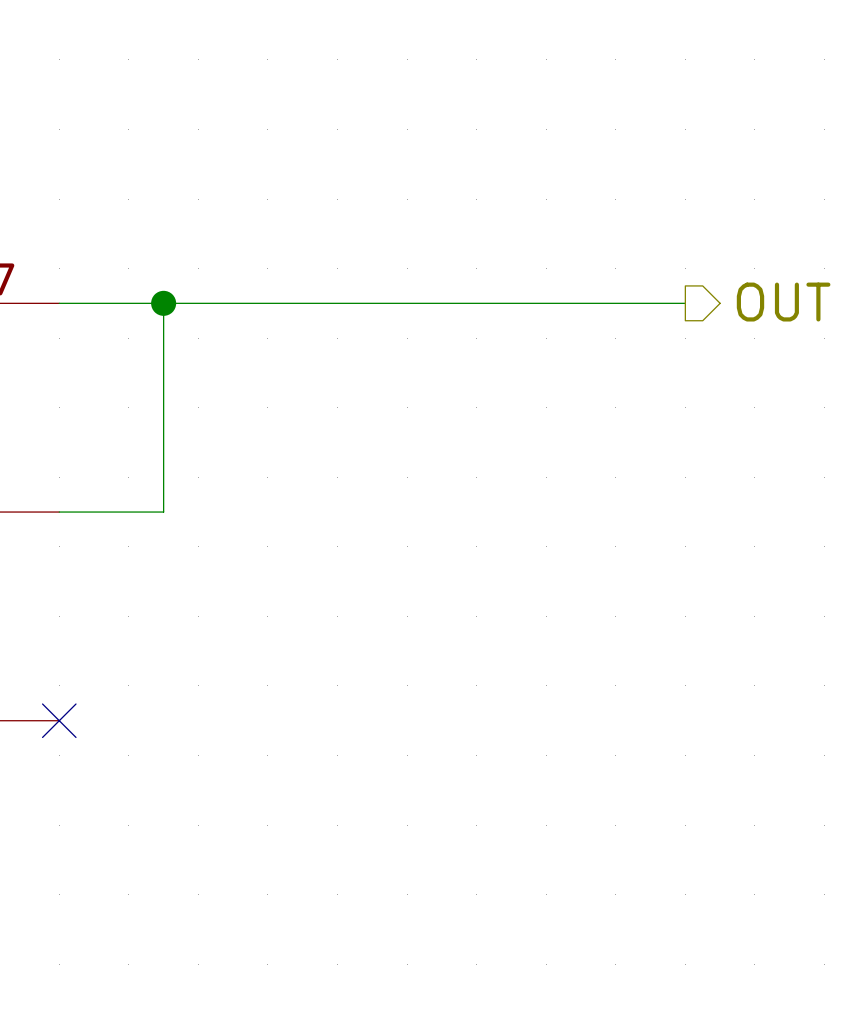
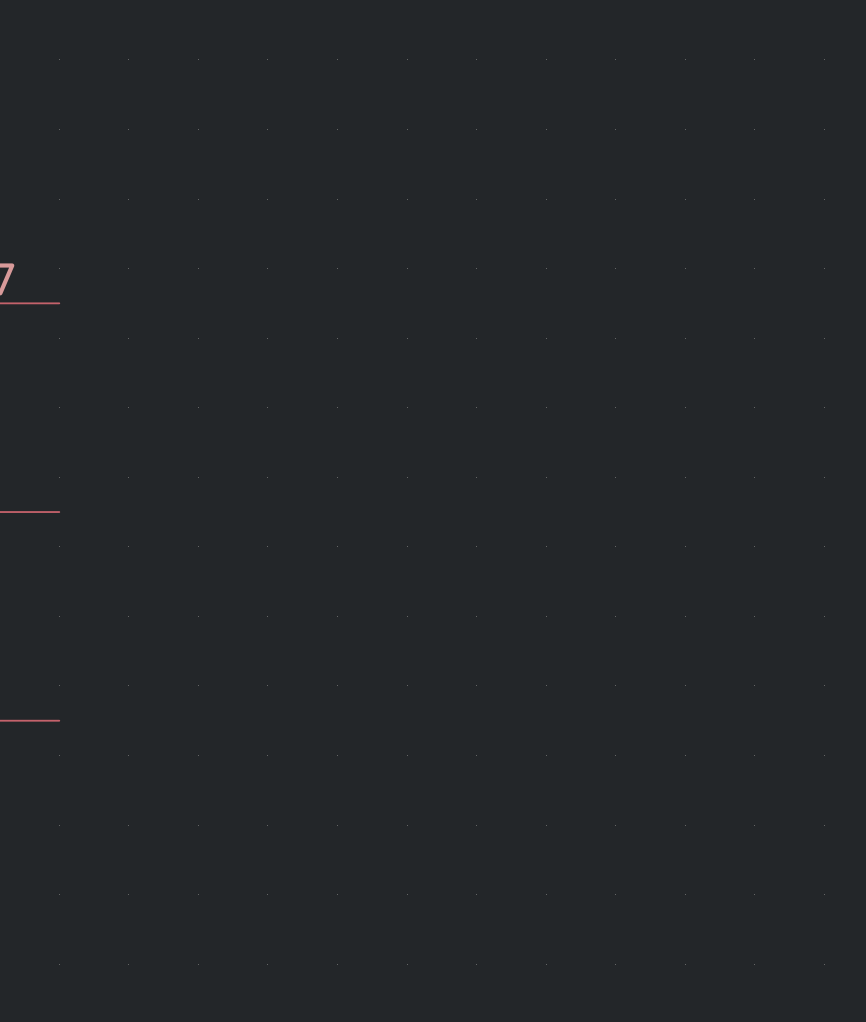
hierarchical label: OUT (783, 302) -> none
wire: (59, 303) (685, 303) -> none
wire: (163, 303) (163, 512) (59, 512) -> none
junction: (163, 303) -> none
no-connect mark: (59, 720) -> none

